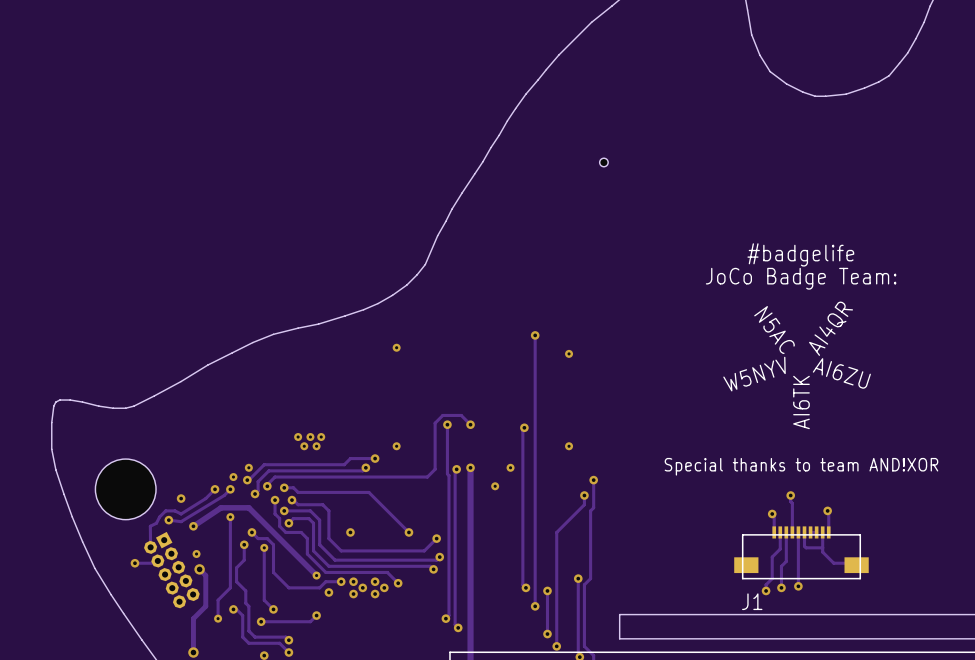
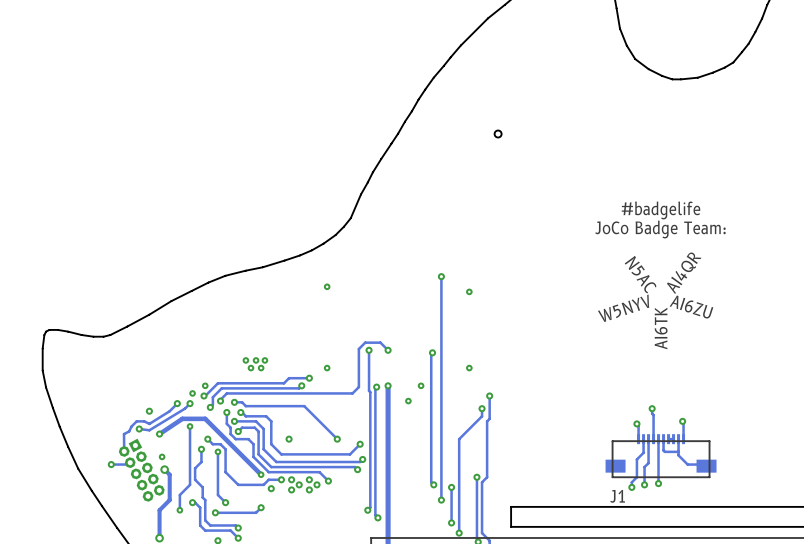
text: Special thanks to team AND!XOR (801, 466) -> none
hole: (125, 489) -> none

